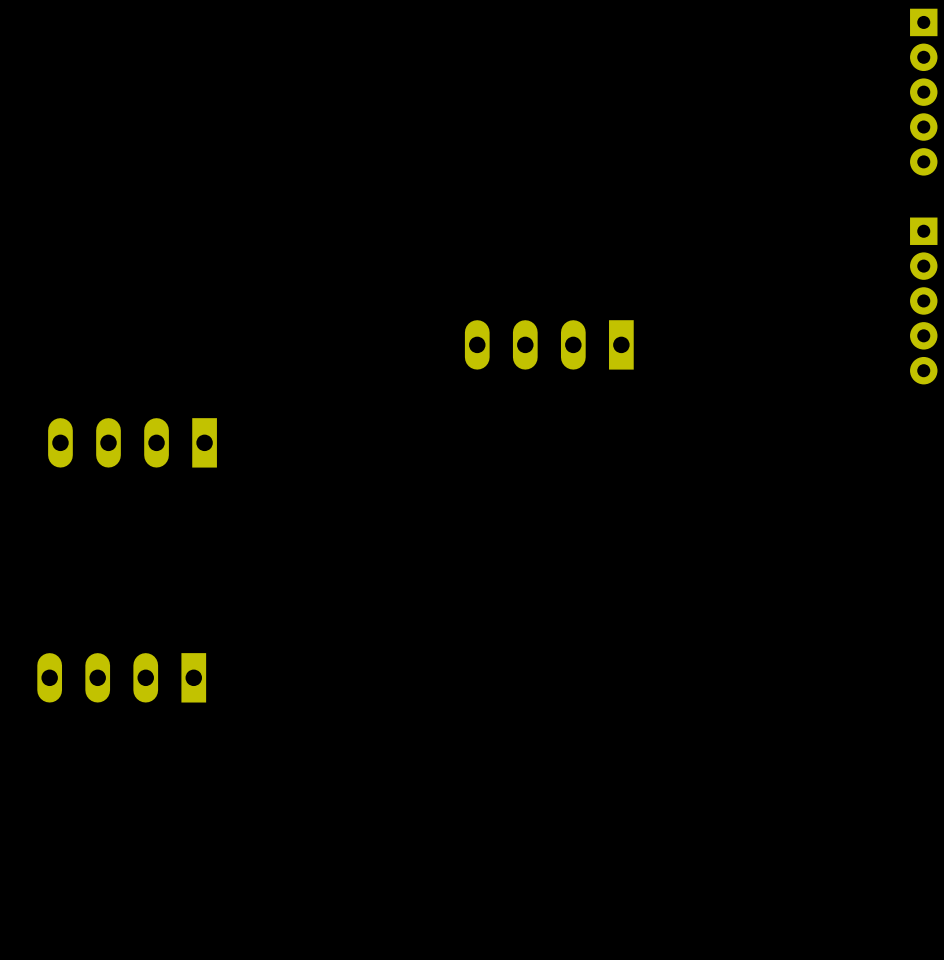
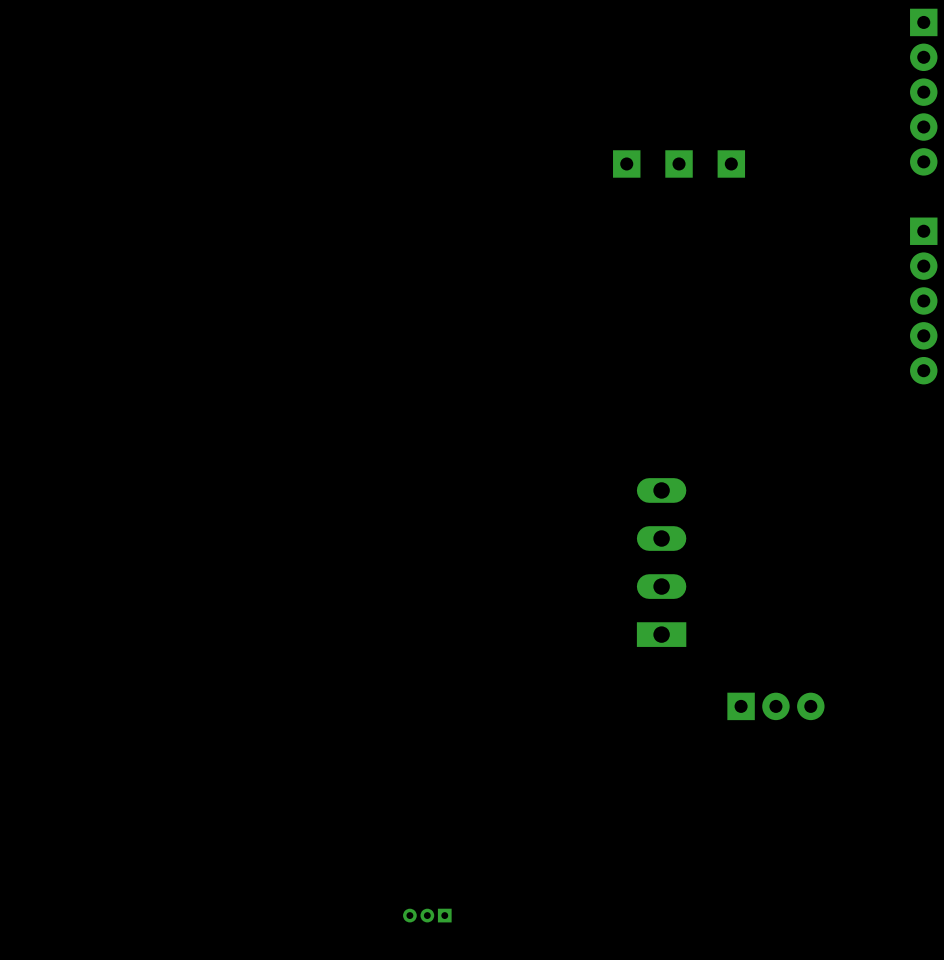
part: none -> (626, 163)
part: none -> (679, 163)
part: none -> (731, 163)
part rotation: 0° (549, 344) -> 90° clockwise (661, 562)
part position: (549, 344) -> (661, 562)
part: (132, 442) -> none
part: (121, 677) -> none
part: none -> (775, 706)
part: none -> (427, 915)

